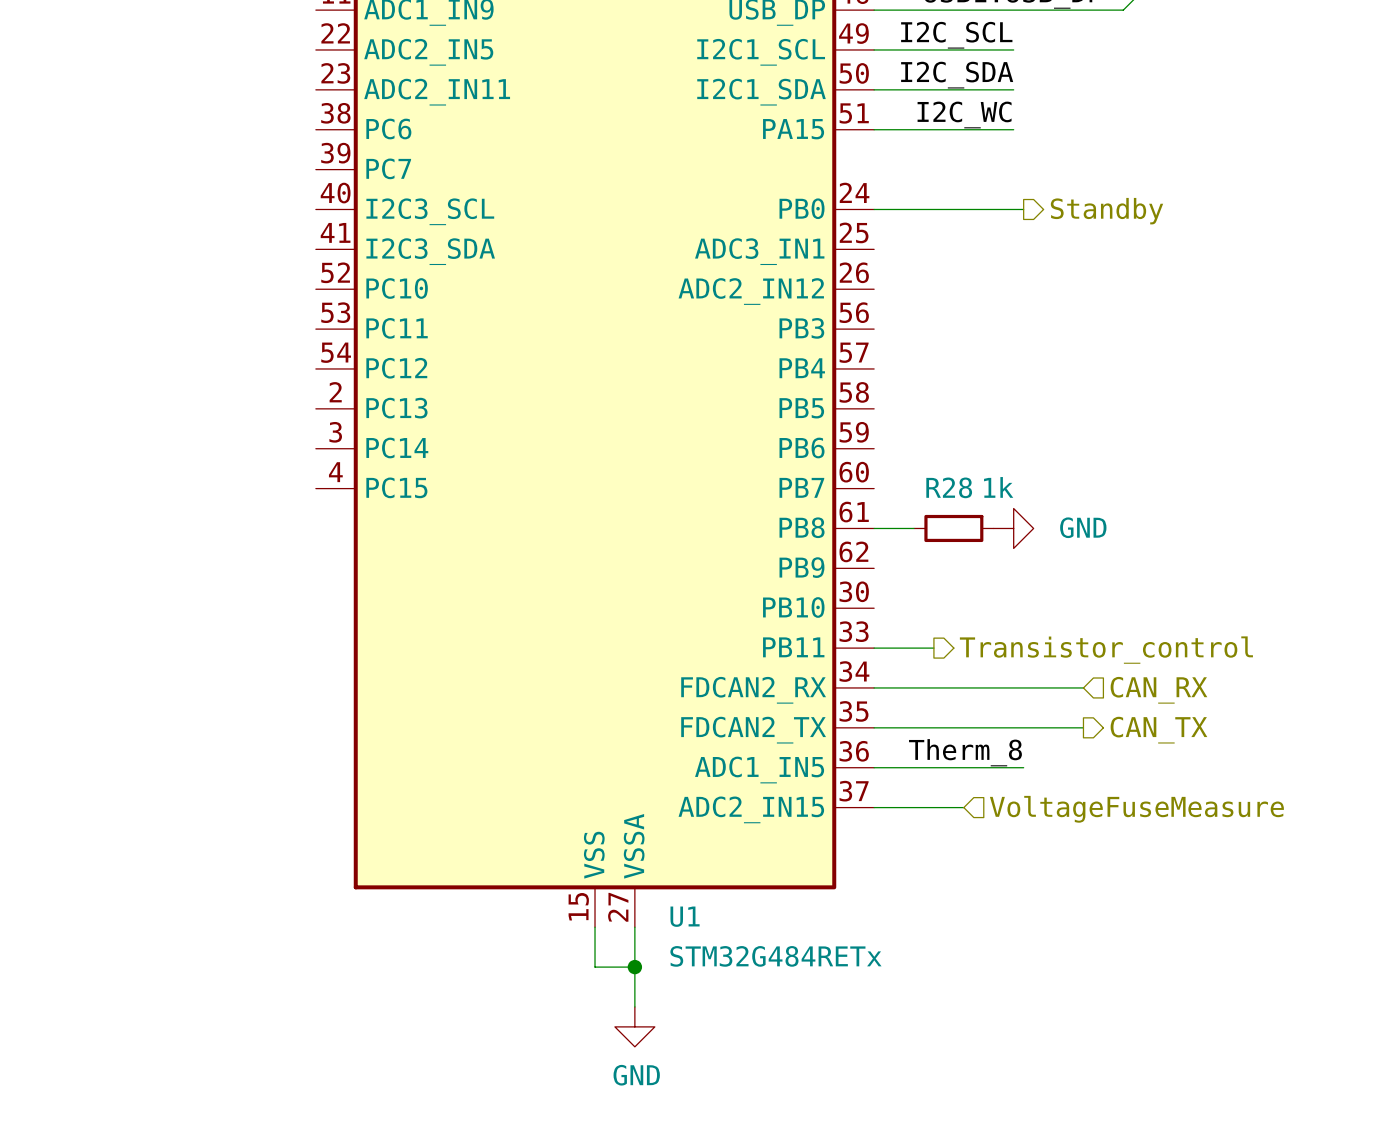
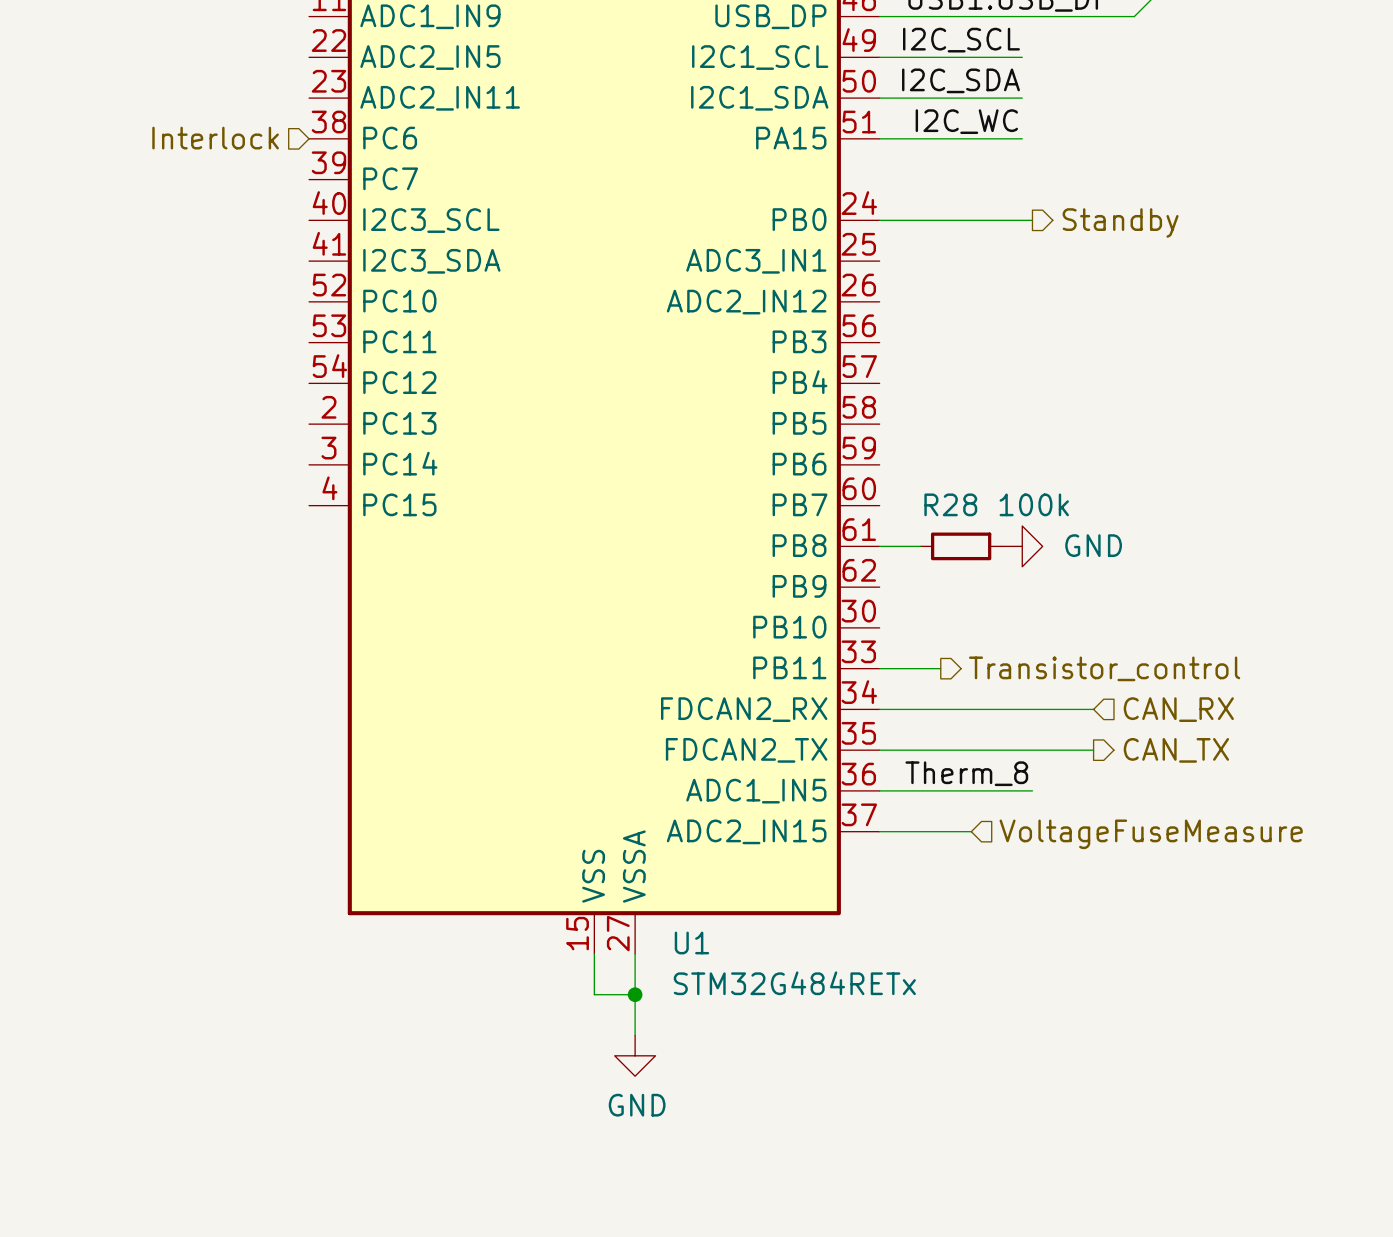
hierarchical label: none -> Interlock (215, 138)
R28 value: 1k (998, 487) -> 100k (1034, 504)

